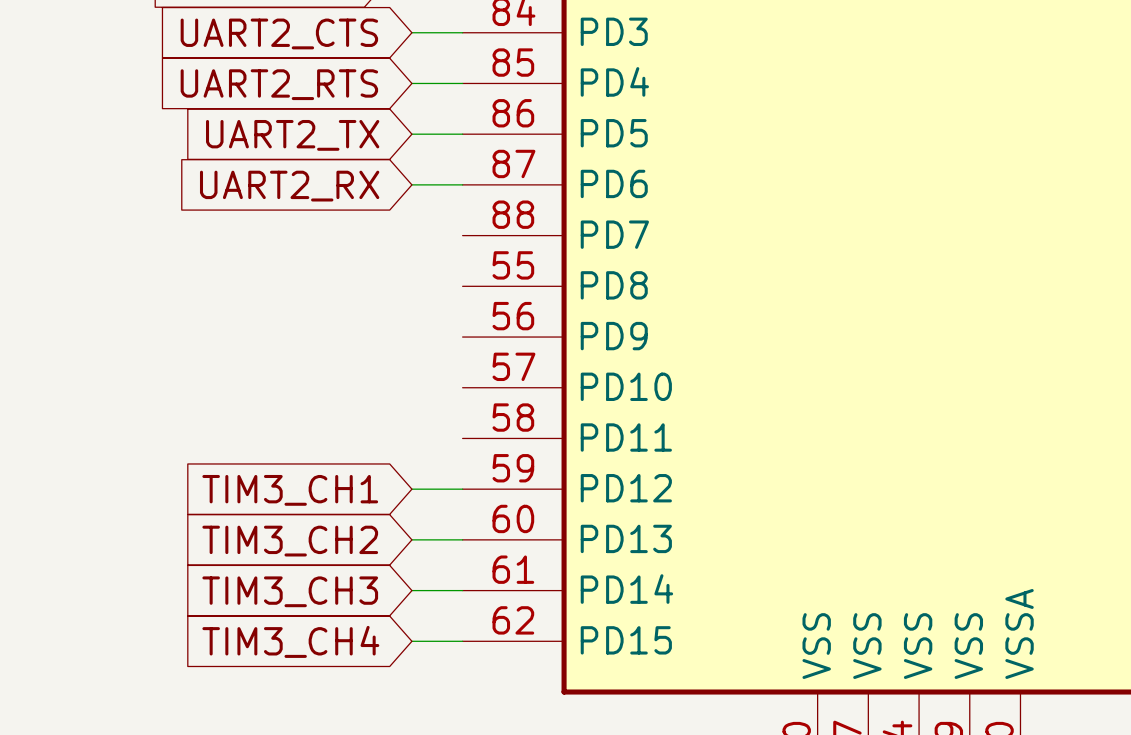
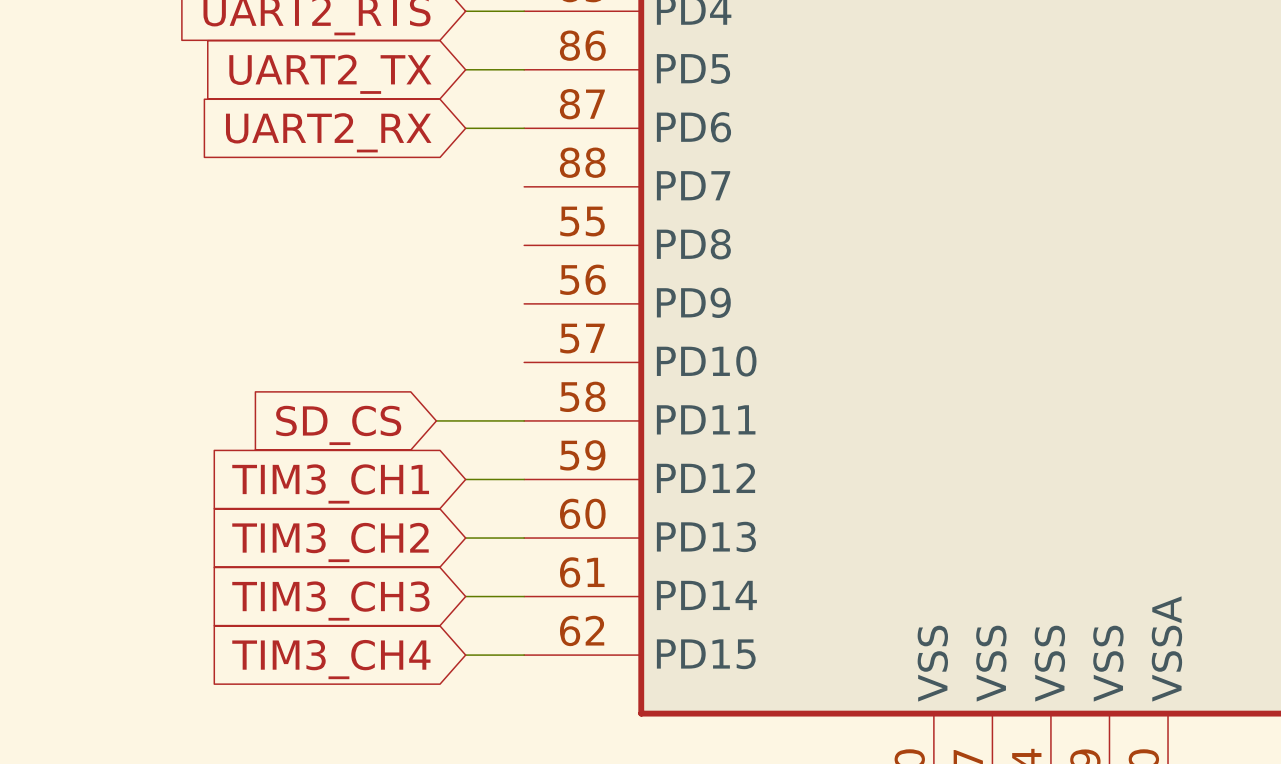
wire: none -> (436, 420) (524, 420)
global label: none -> SD_CS (338, 425)

